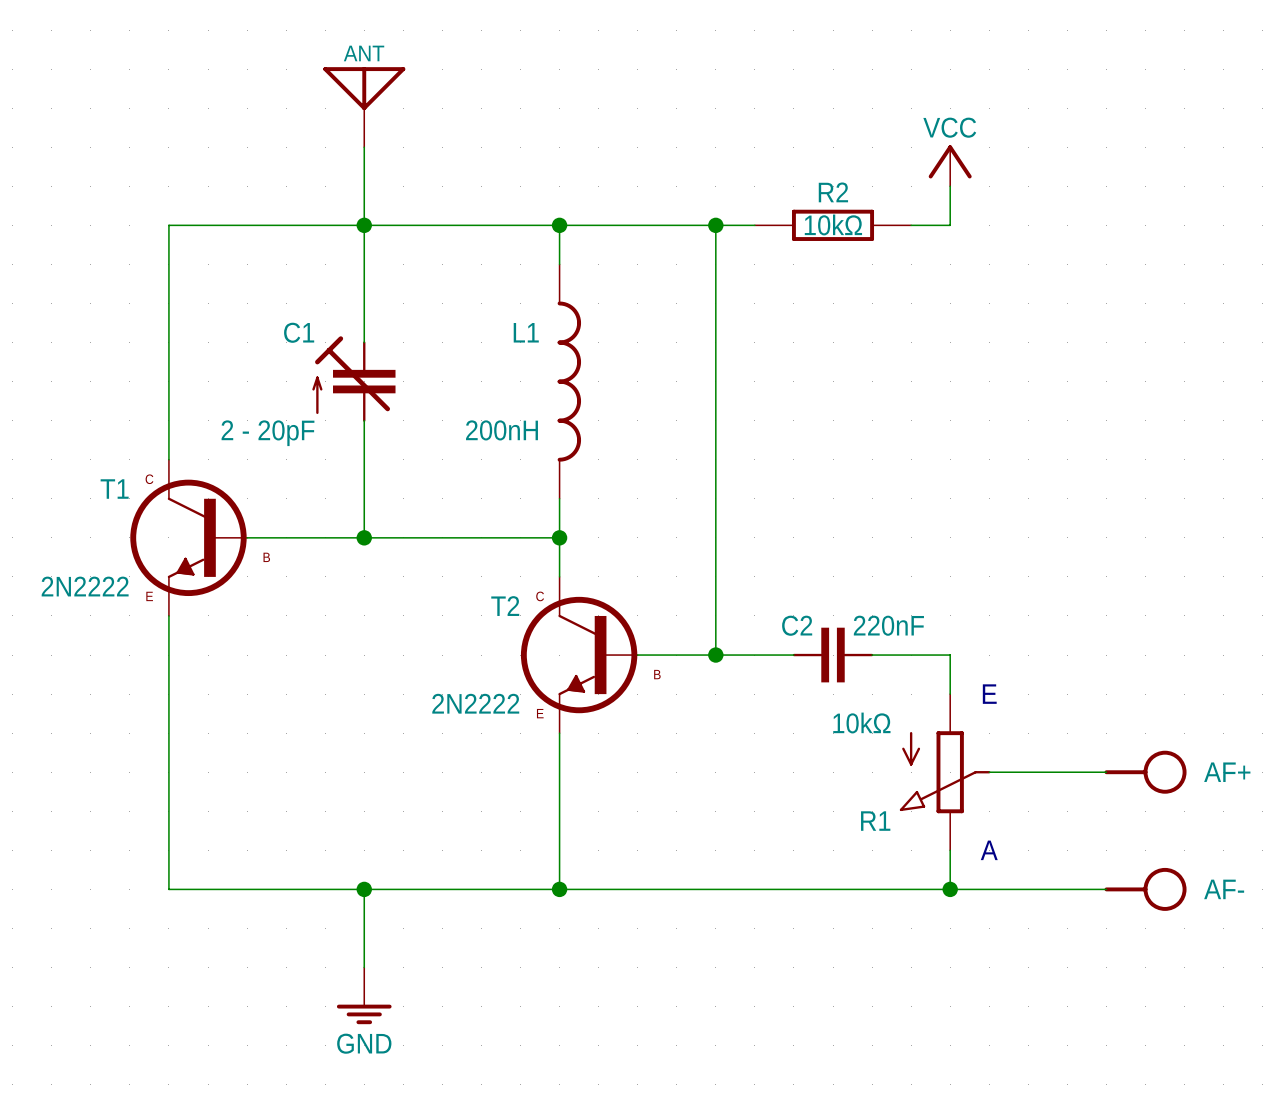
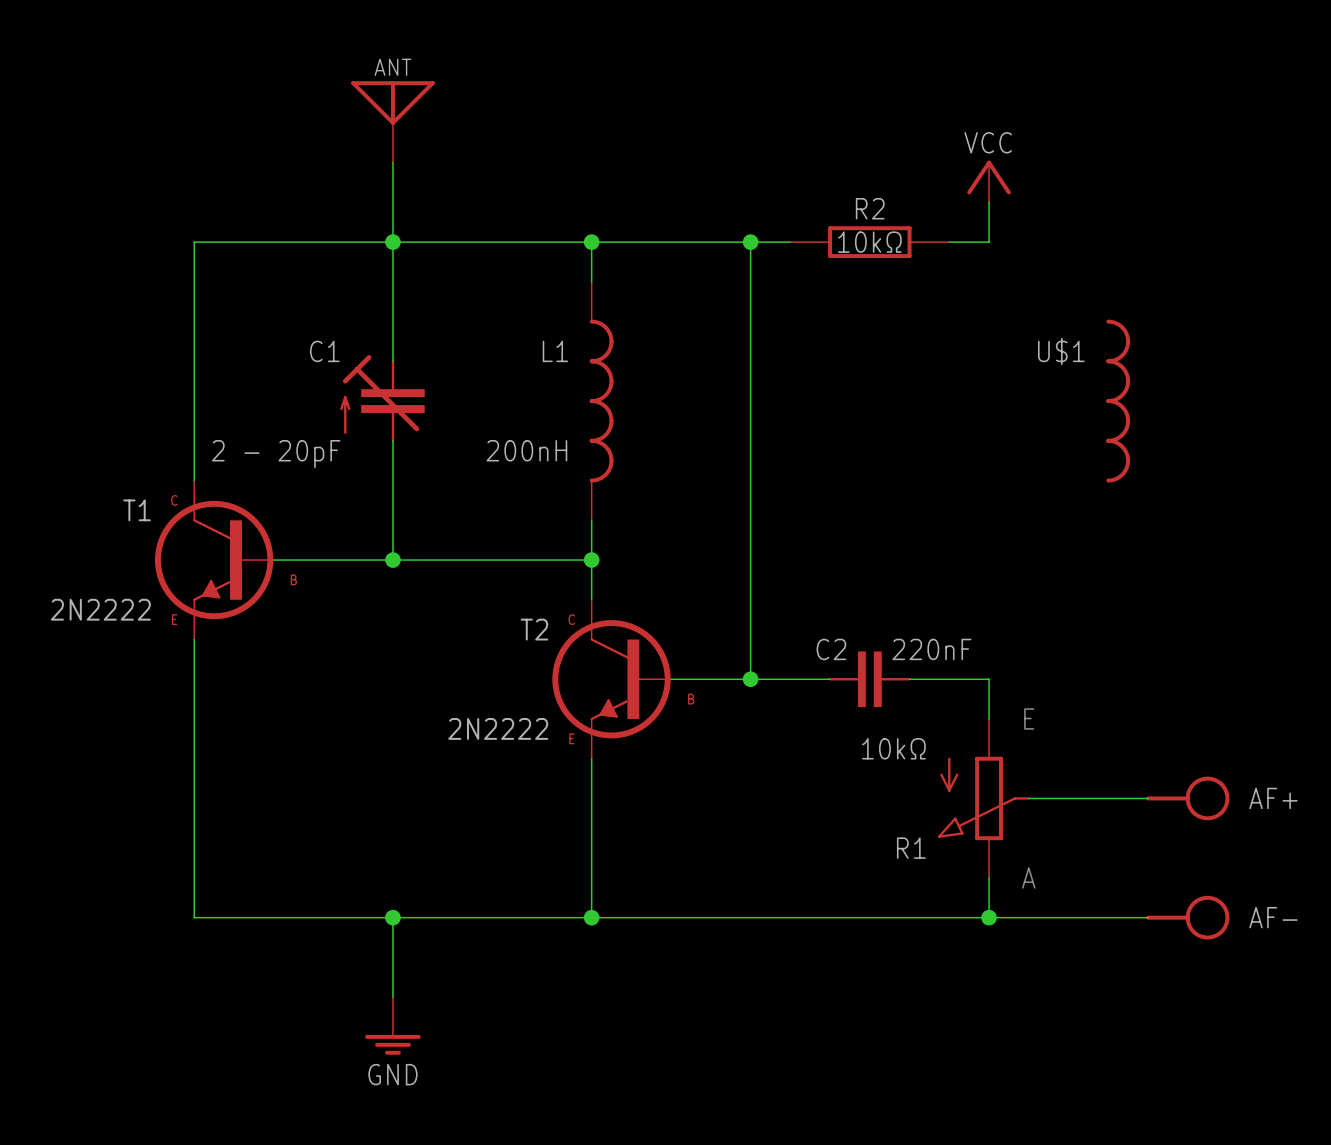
U$1: none -> (1118, 401)

